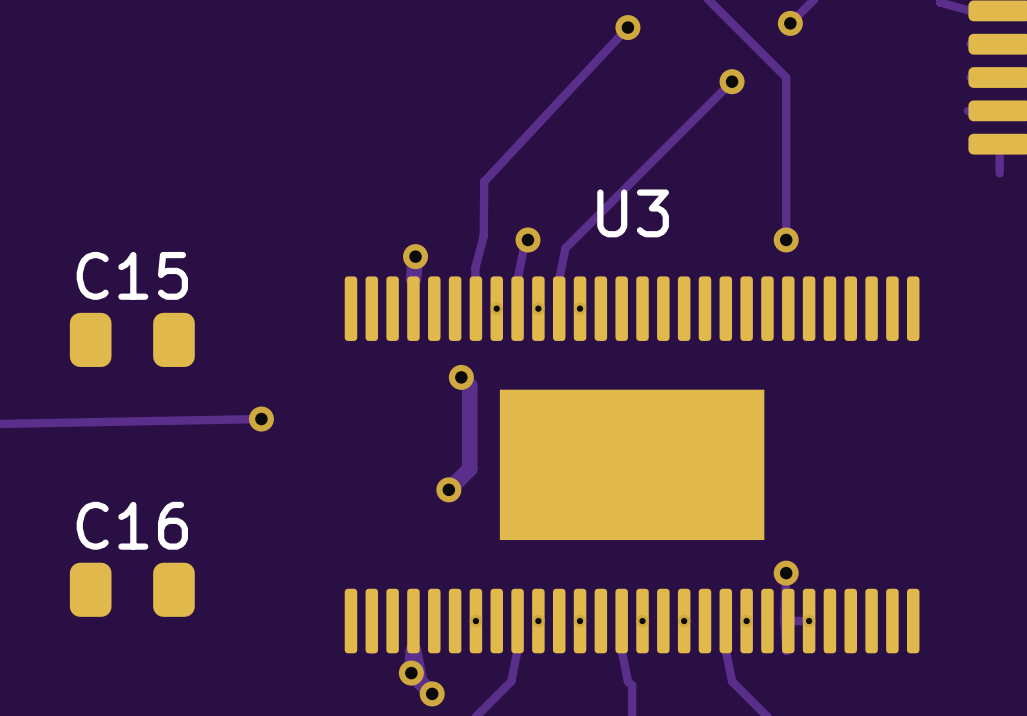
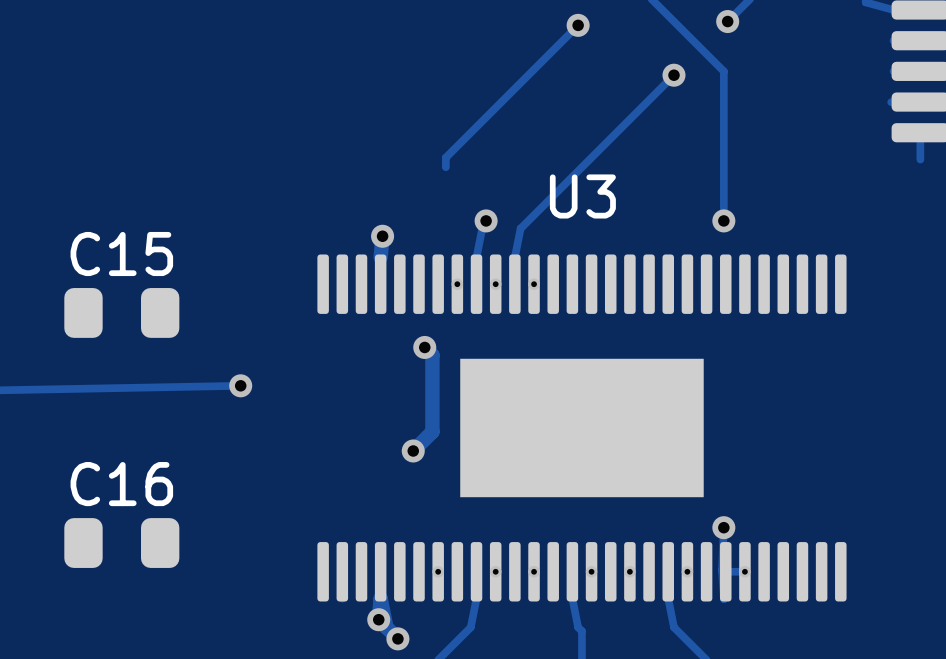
track: (627, 27) (484, 181) (483, 236) (475, 267) (475, 308) -> (578, 25) (445, 157) (445, 167)

